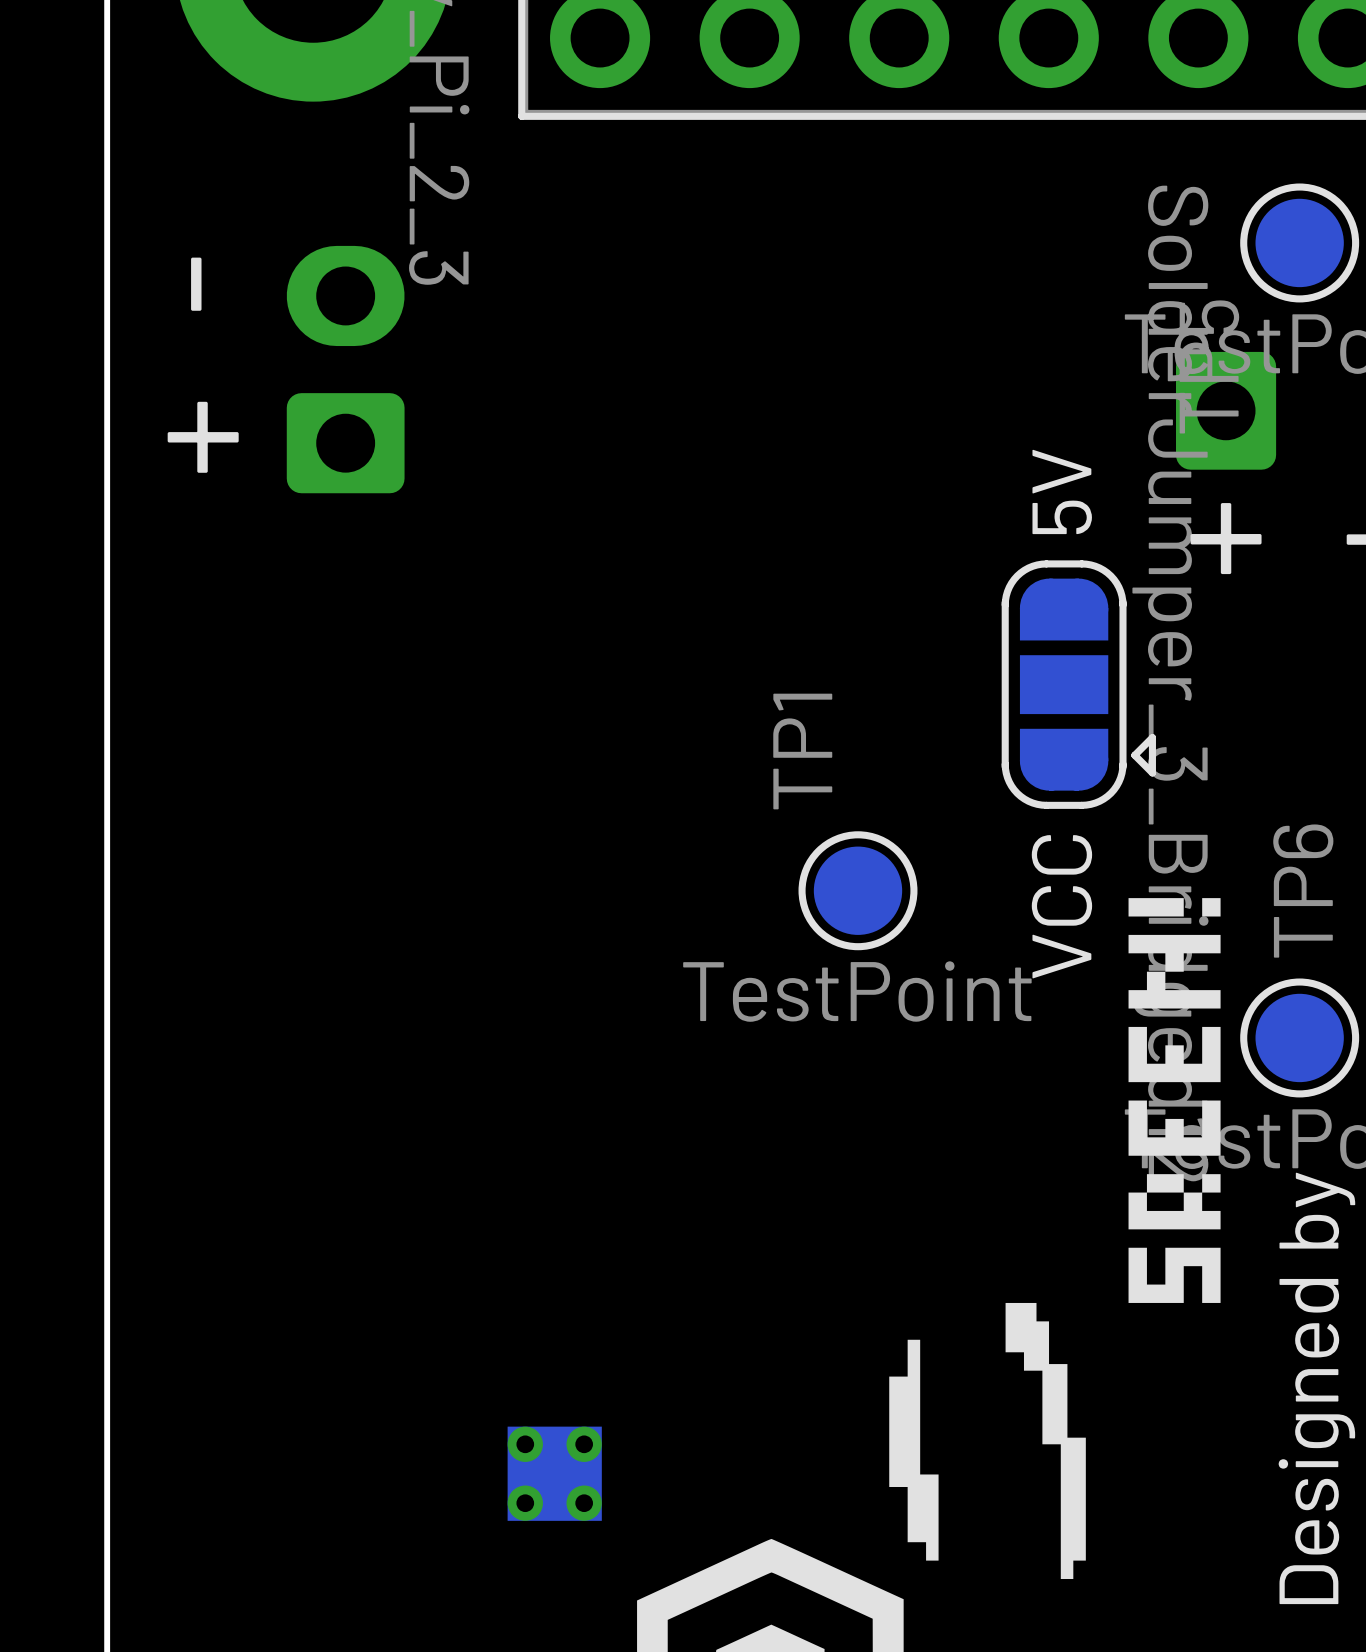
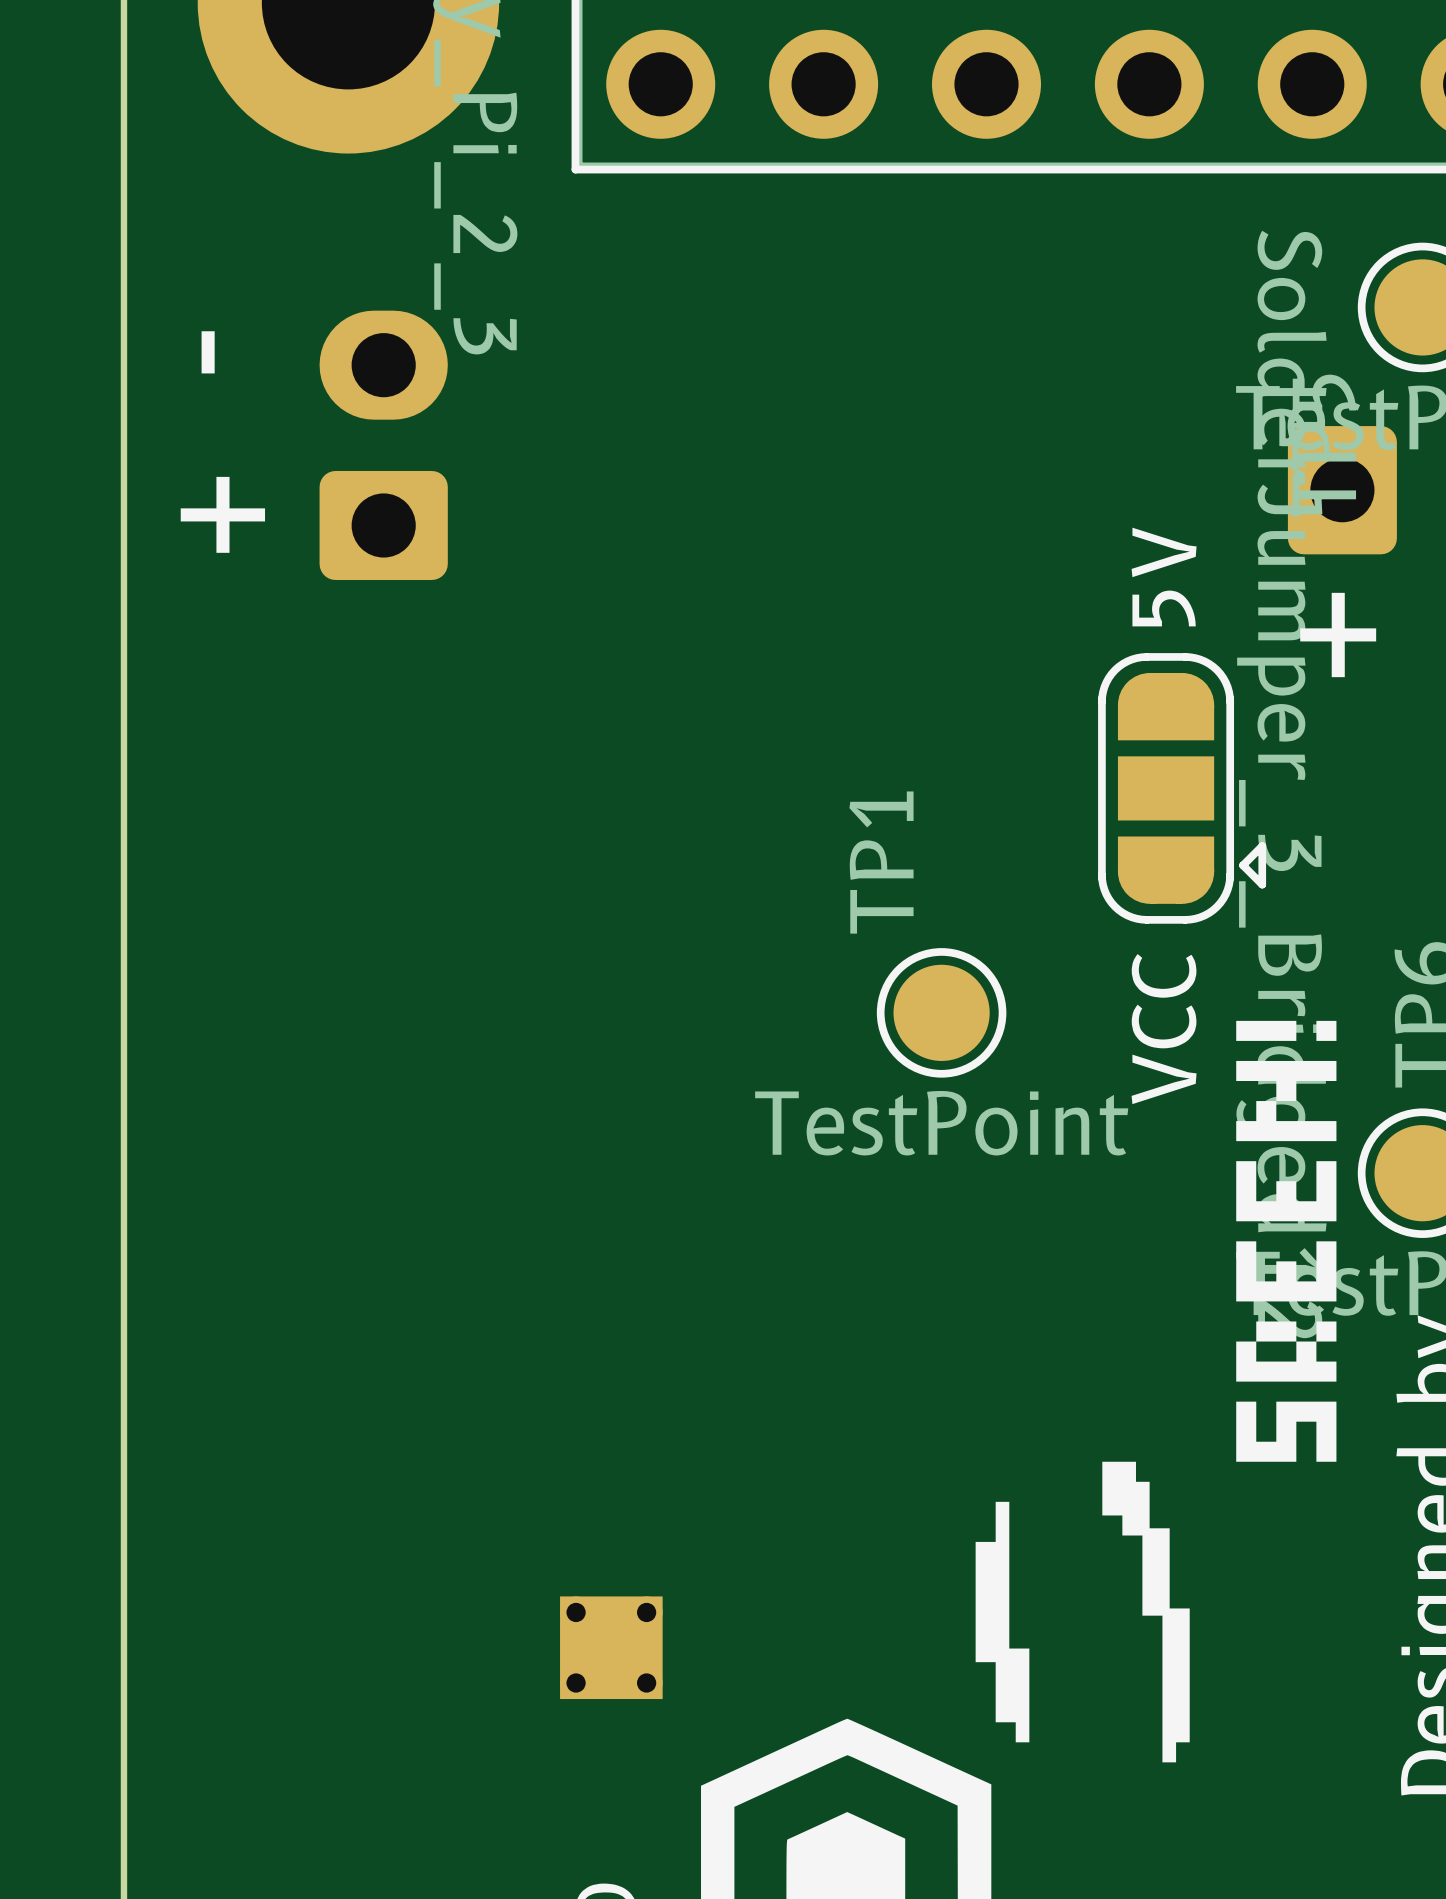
part footprint: [507, 1426, 602, 1521] -> [560, 1596, 663, 1700]

